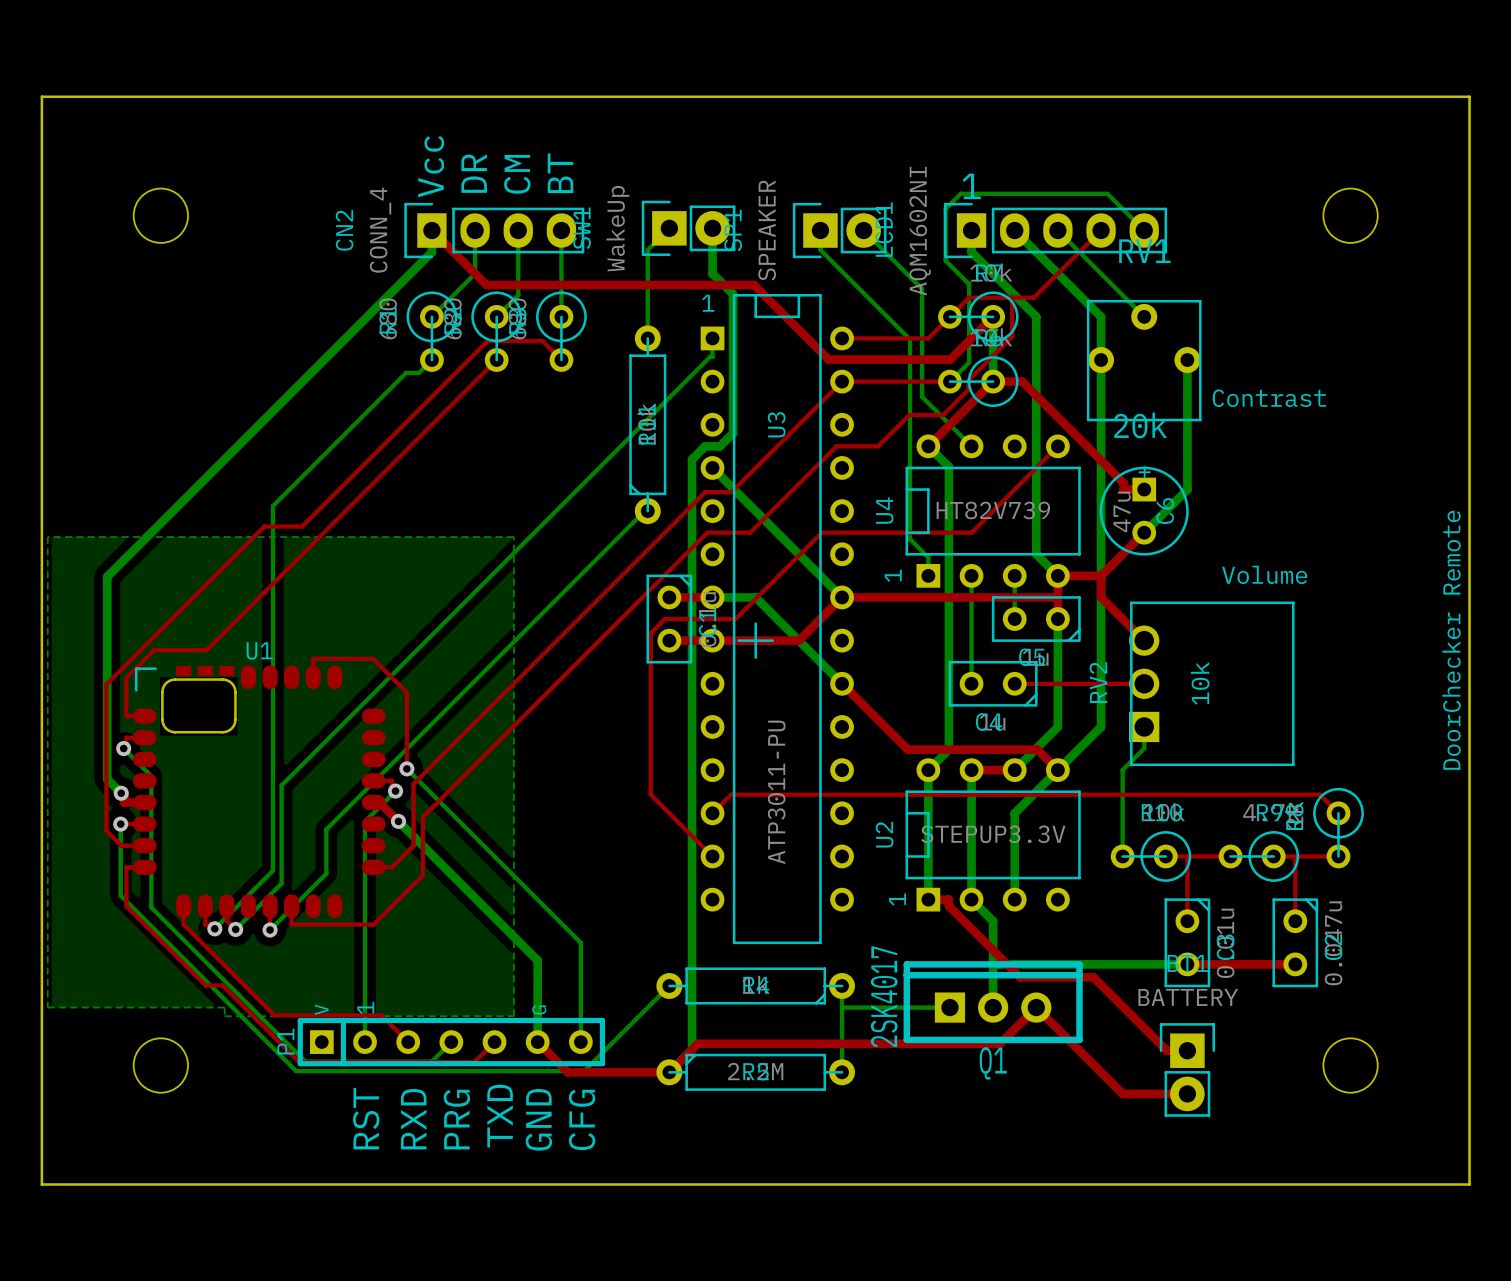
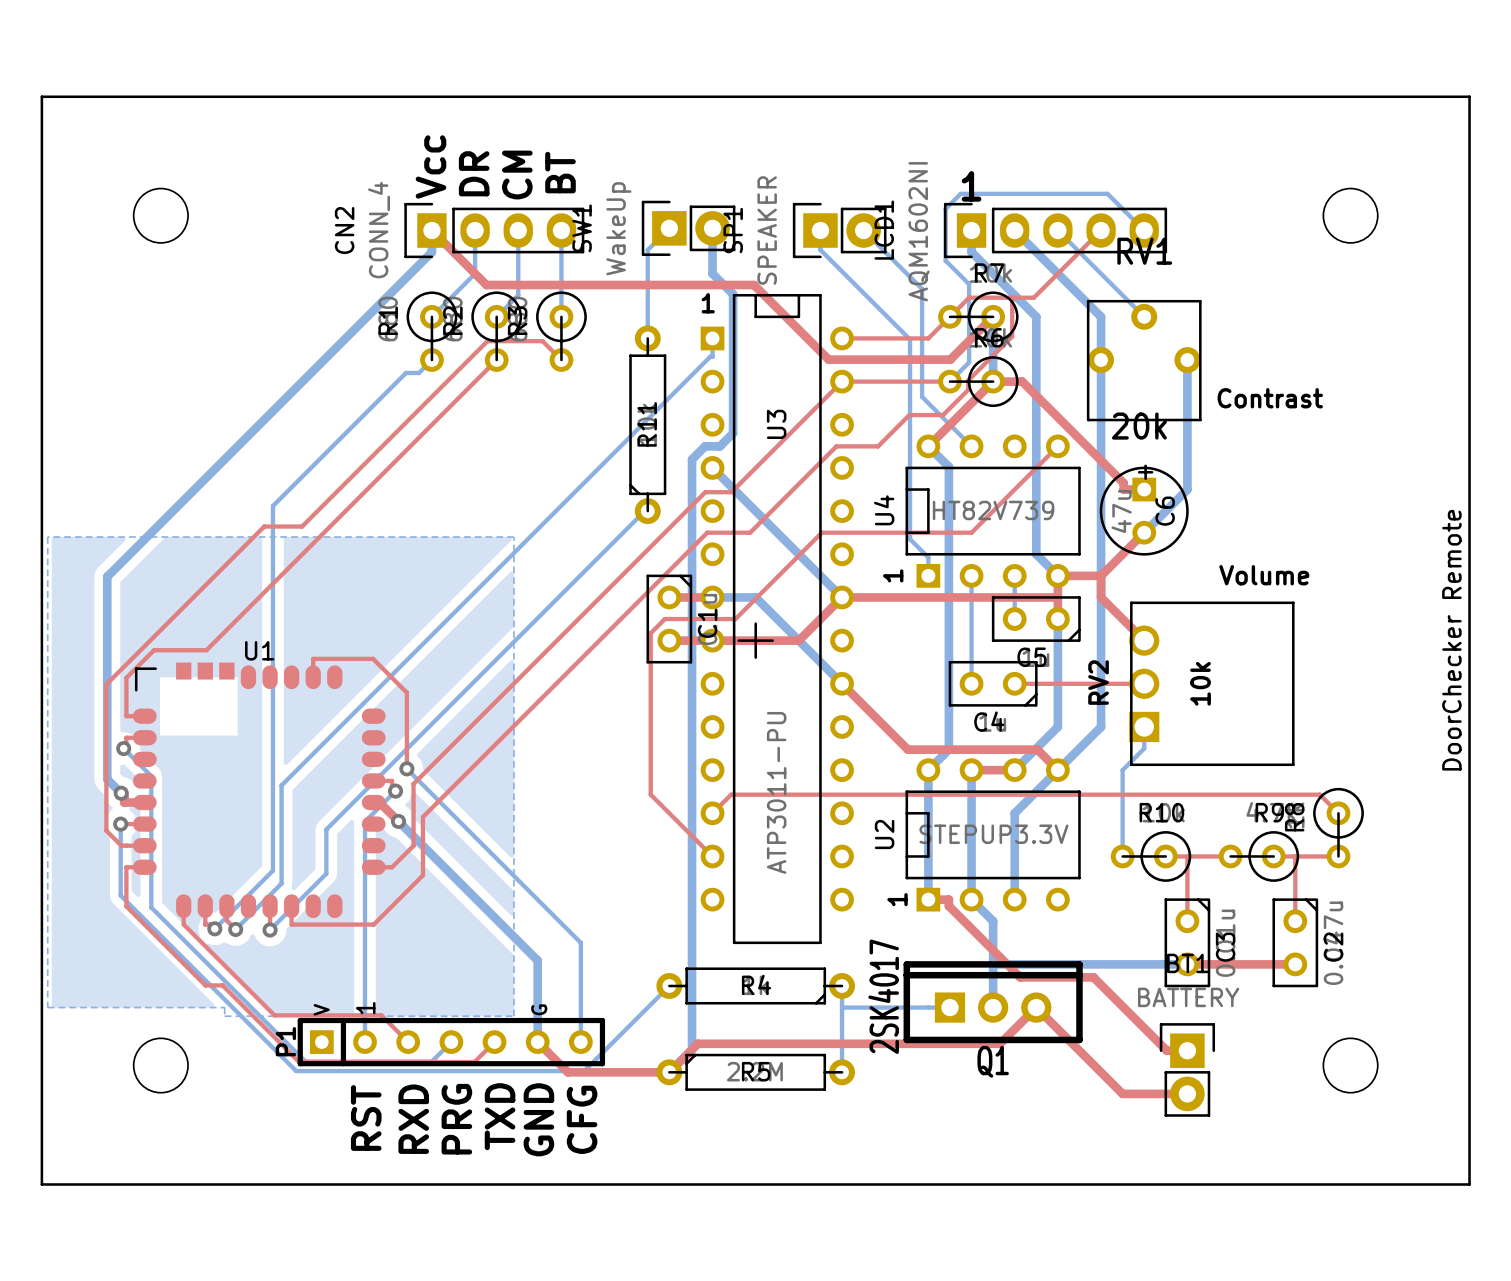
U1 footprint: [132, 665, 386, 919] -> [132, 662, 386, 919]

